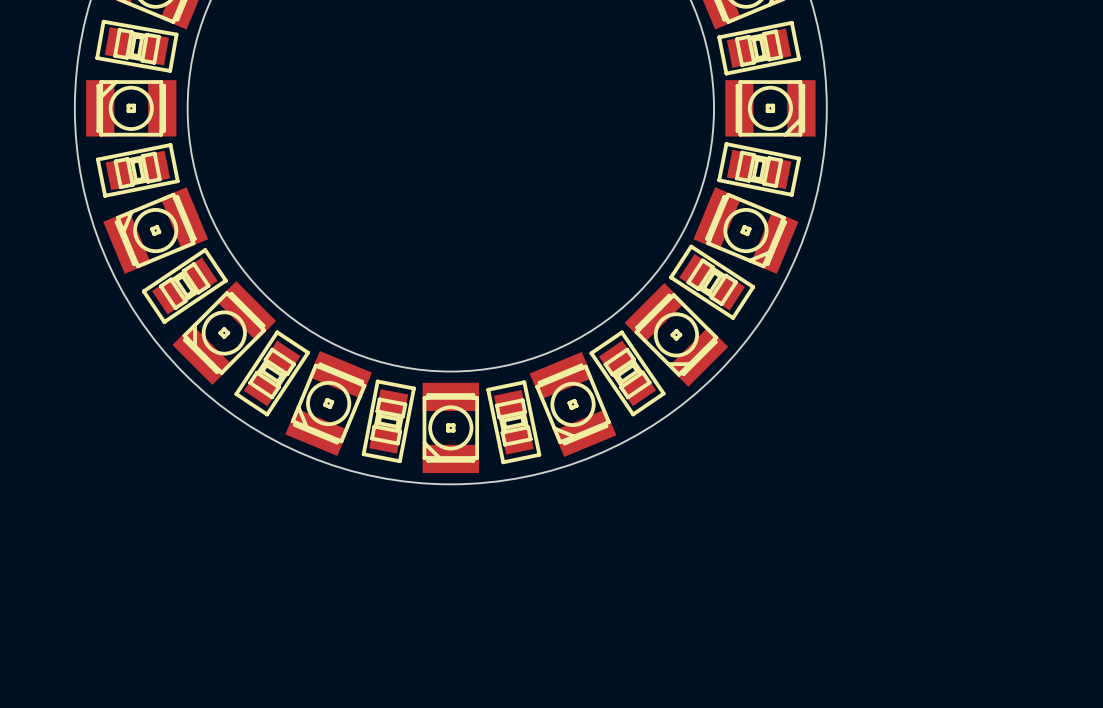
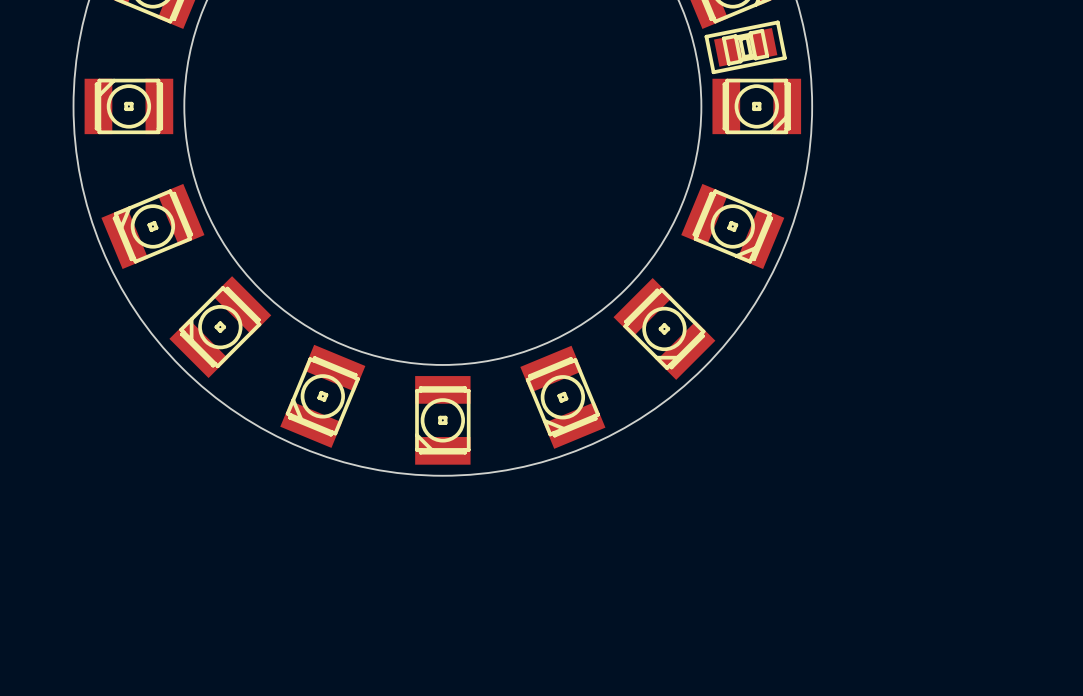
part: (136, 46) -> none
part: (759, 169) -> none
part: (137, 170) -> none
part: (712, 282) -> none
part: (184, 286) -> none
part: (272, 373) -> none
part: (627, 373) -> none
part: (388, 421) -> none
part: (513, 422) -> none

